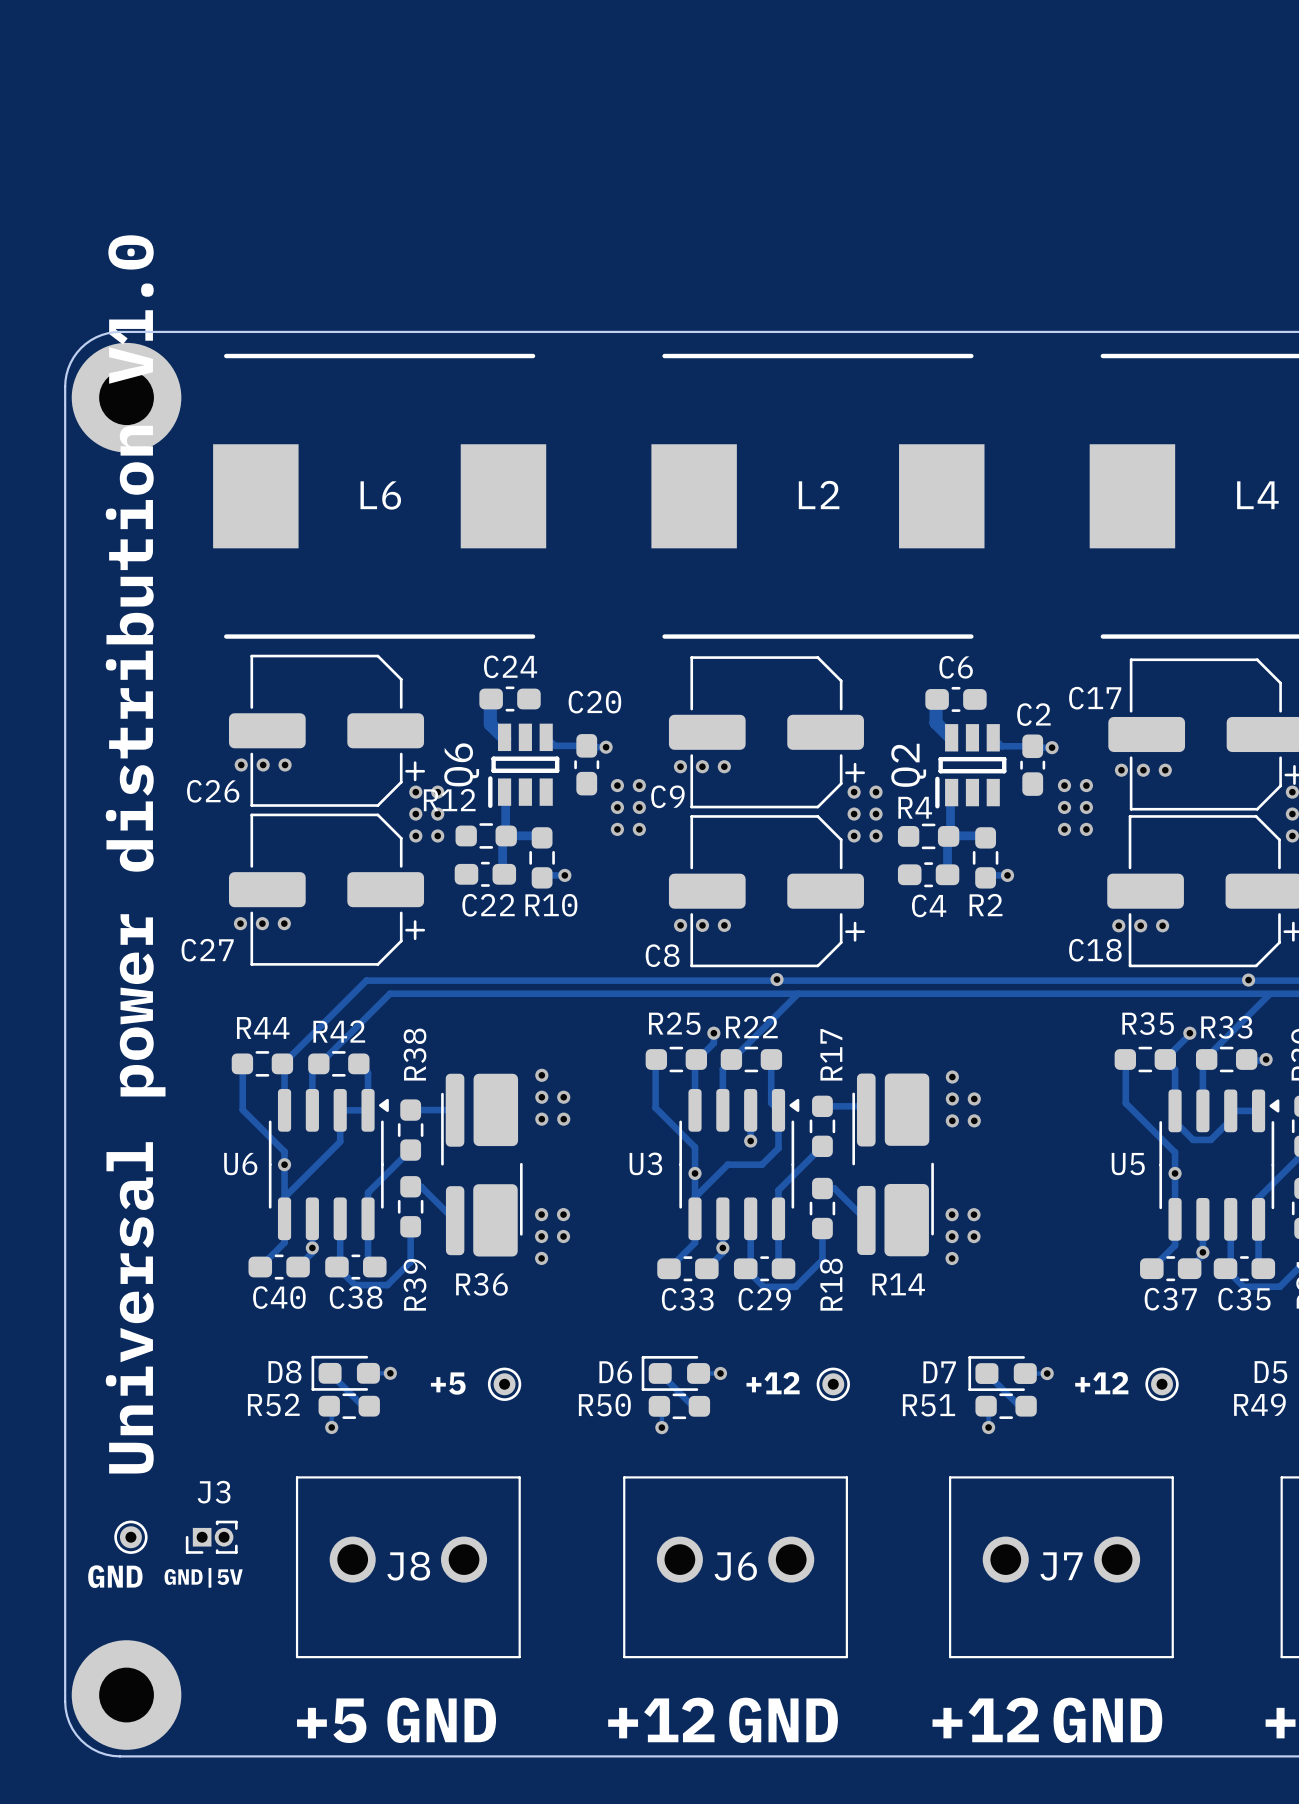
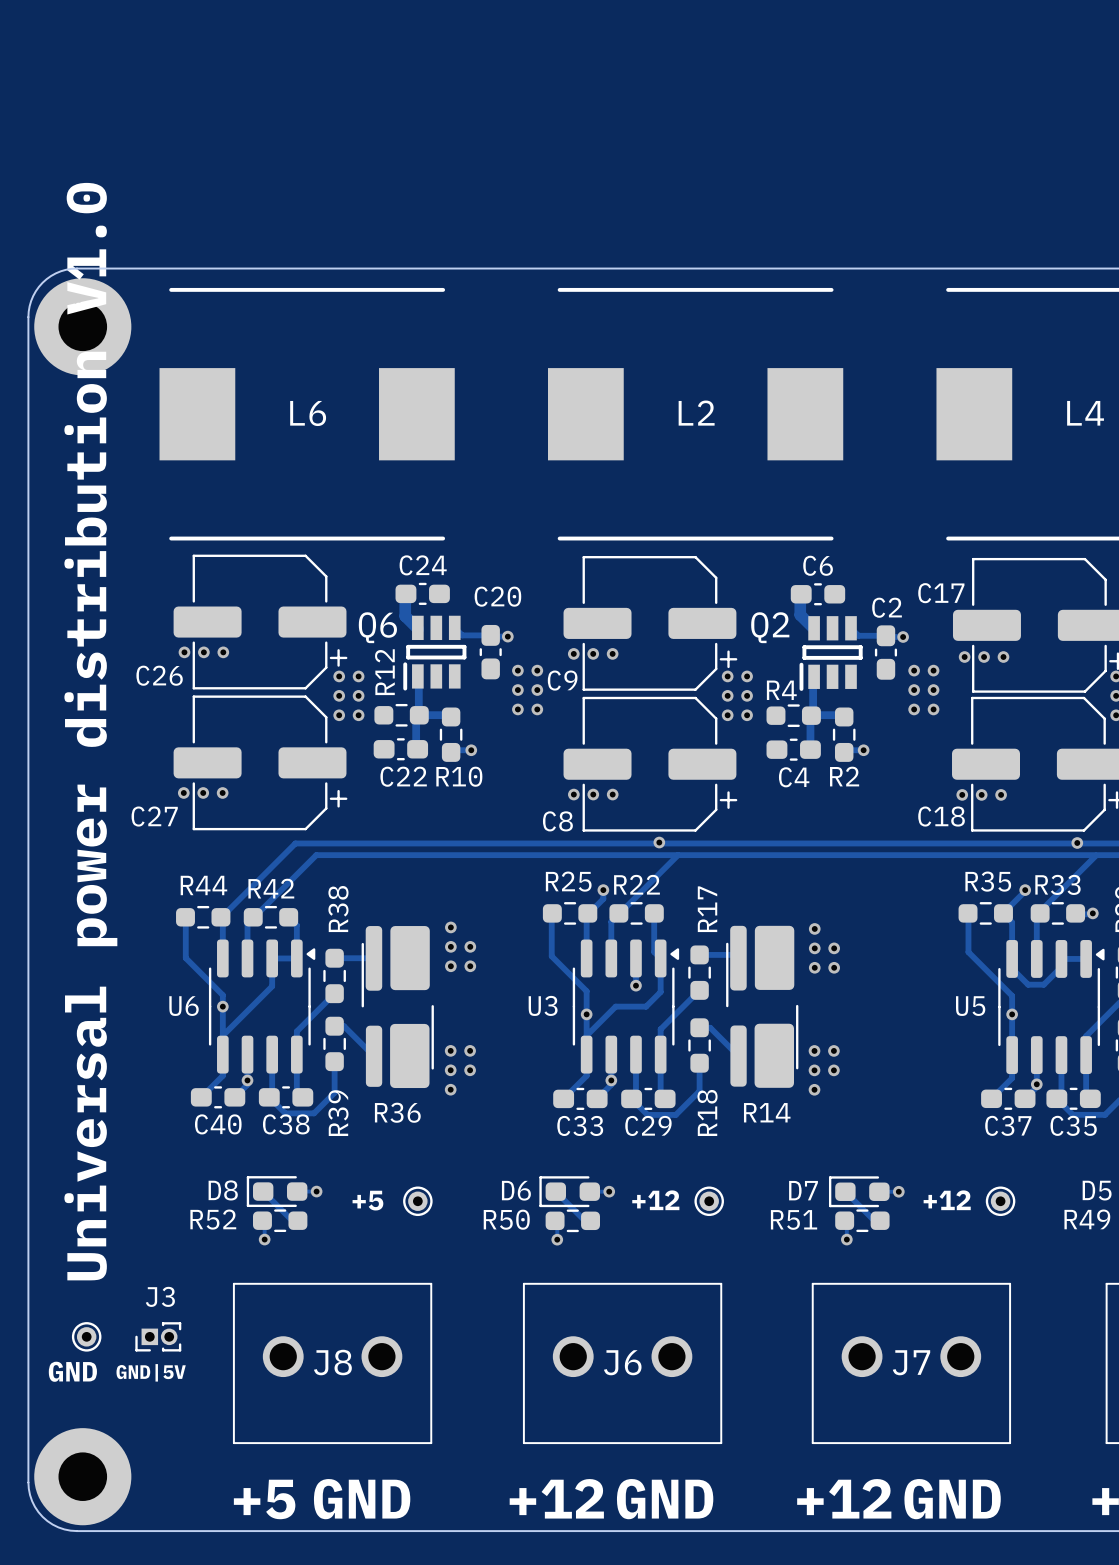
Q6 name rotation: 0° (461, 764) -> 90° clockwise (377, 627)
Q2 name rotation: 0° (908, 765) -> 90° clockwise (770, 627)
R12 name rotation: 0° (449, 800) -> 90° counterclockwise (384, 672)

